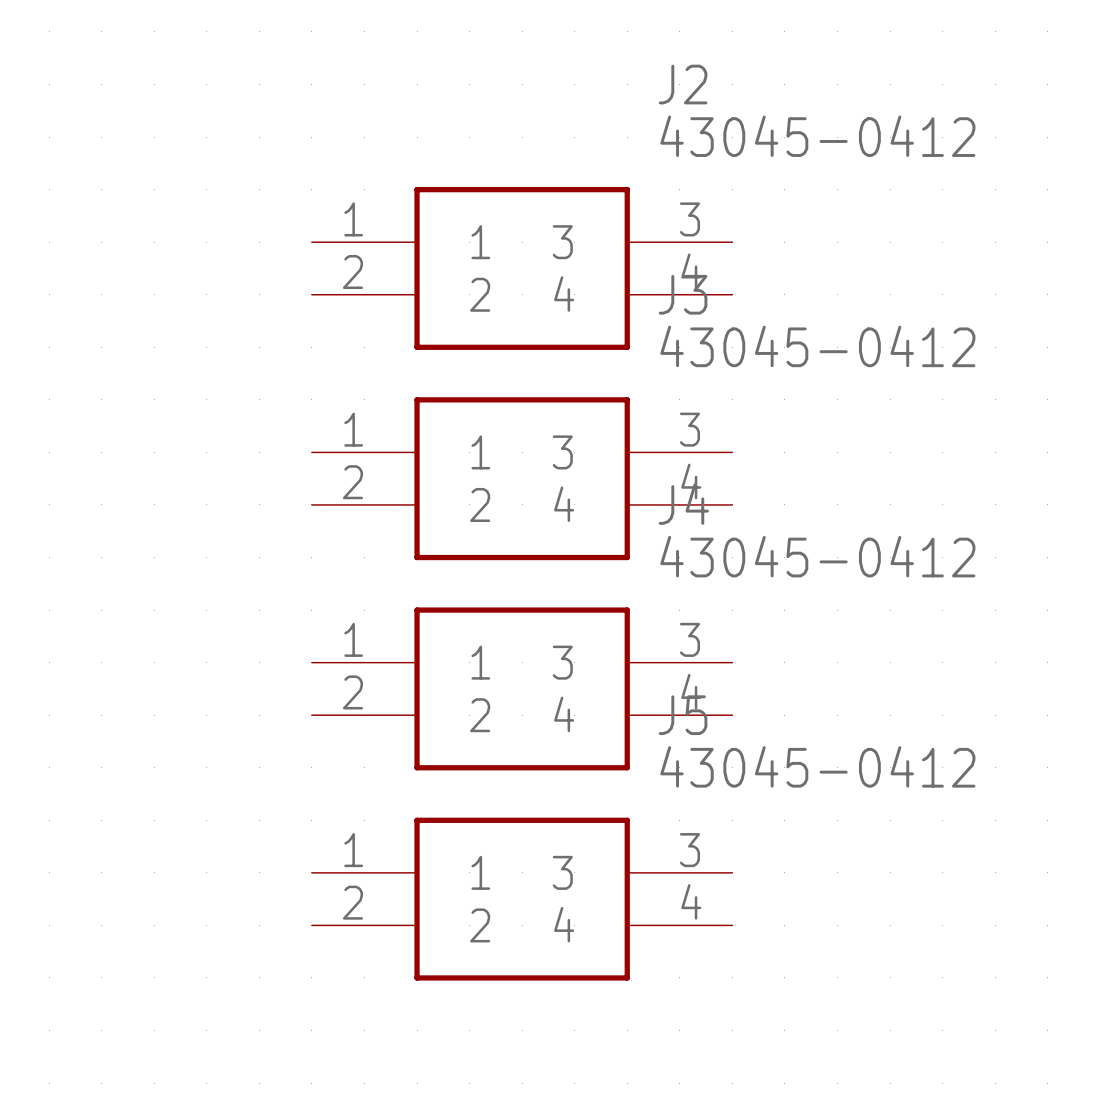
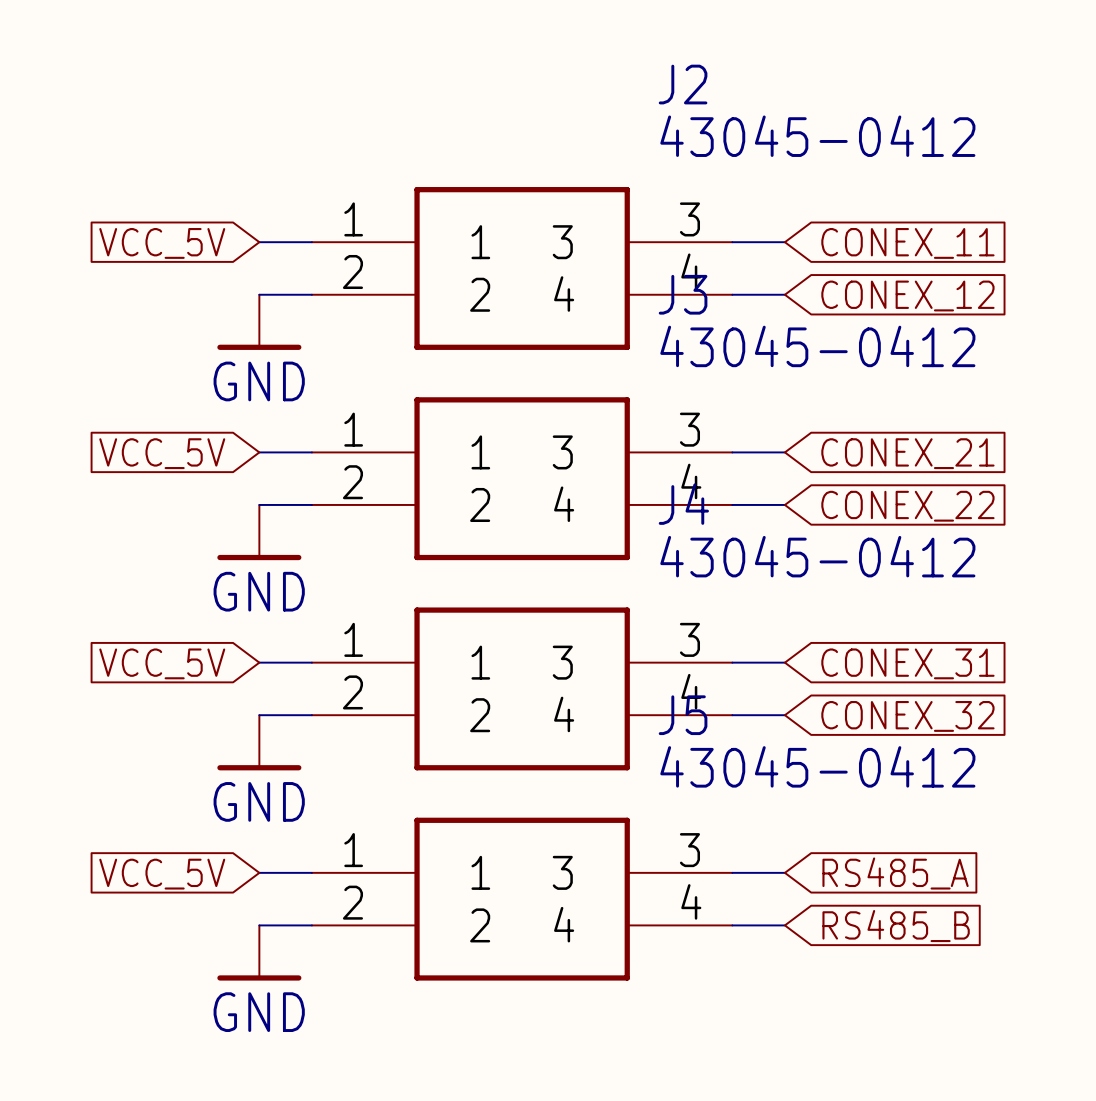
wire: none -> (259, 242) (311, 242)
wire: none -> (732, 242) (784, 242)
global label: none -> VCC_5V (162, 243)
global label: none -> CONEX_11 (907, 243)
wire: none -> (259, 294) (311, 294)
wire: none -> (732, 294) (784, 294)
global label: none -> CONEX_12 (907, 296)
power symbol: none -> GND (259, 322)
wire: none -> (259, 452) (311, 452)
wire: none -> (732, 452) (784, 452)
global label: none -> VCC_5V (162, 453)
global label: none -> CONEX_21 (907, 453)
wire: none -> (259, 504) (311, 504)
wire: none -> (732, 504) (784, 504)
global label: none -> CONEX_22 (907, 506)
power symbol: none -> GND (259, 532)
wire: none -> (259, 662) (311, 662)
wire: none -> (732, 662) (784, 662)
global label: none -> VCC_5V (162, 663)
global label: none -> CONEX_31 (907, 663)
wire: none -> (259, 715) (311, 715)
wire: none -> (732, 715) (784, 715)
global label: none -> CONEX_32 (907, 716)
power symbol: none -> GND (259, 742)
wire: none -> (259, 872) (311, 872)
wire: none -> (732, 872) (784, 872)
global label: none -> RS485_A (895, 873)
global label: none -> VCC_5V (162, 874)
wire: none -> (259, 925) (311, 925)
wire: none -> (732, 925) (784, 925)
global label: none -> RS485_B (896, 926)
power symbol: none -> GND (259, 953)

